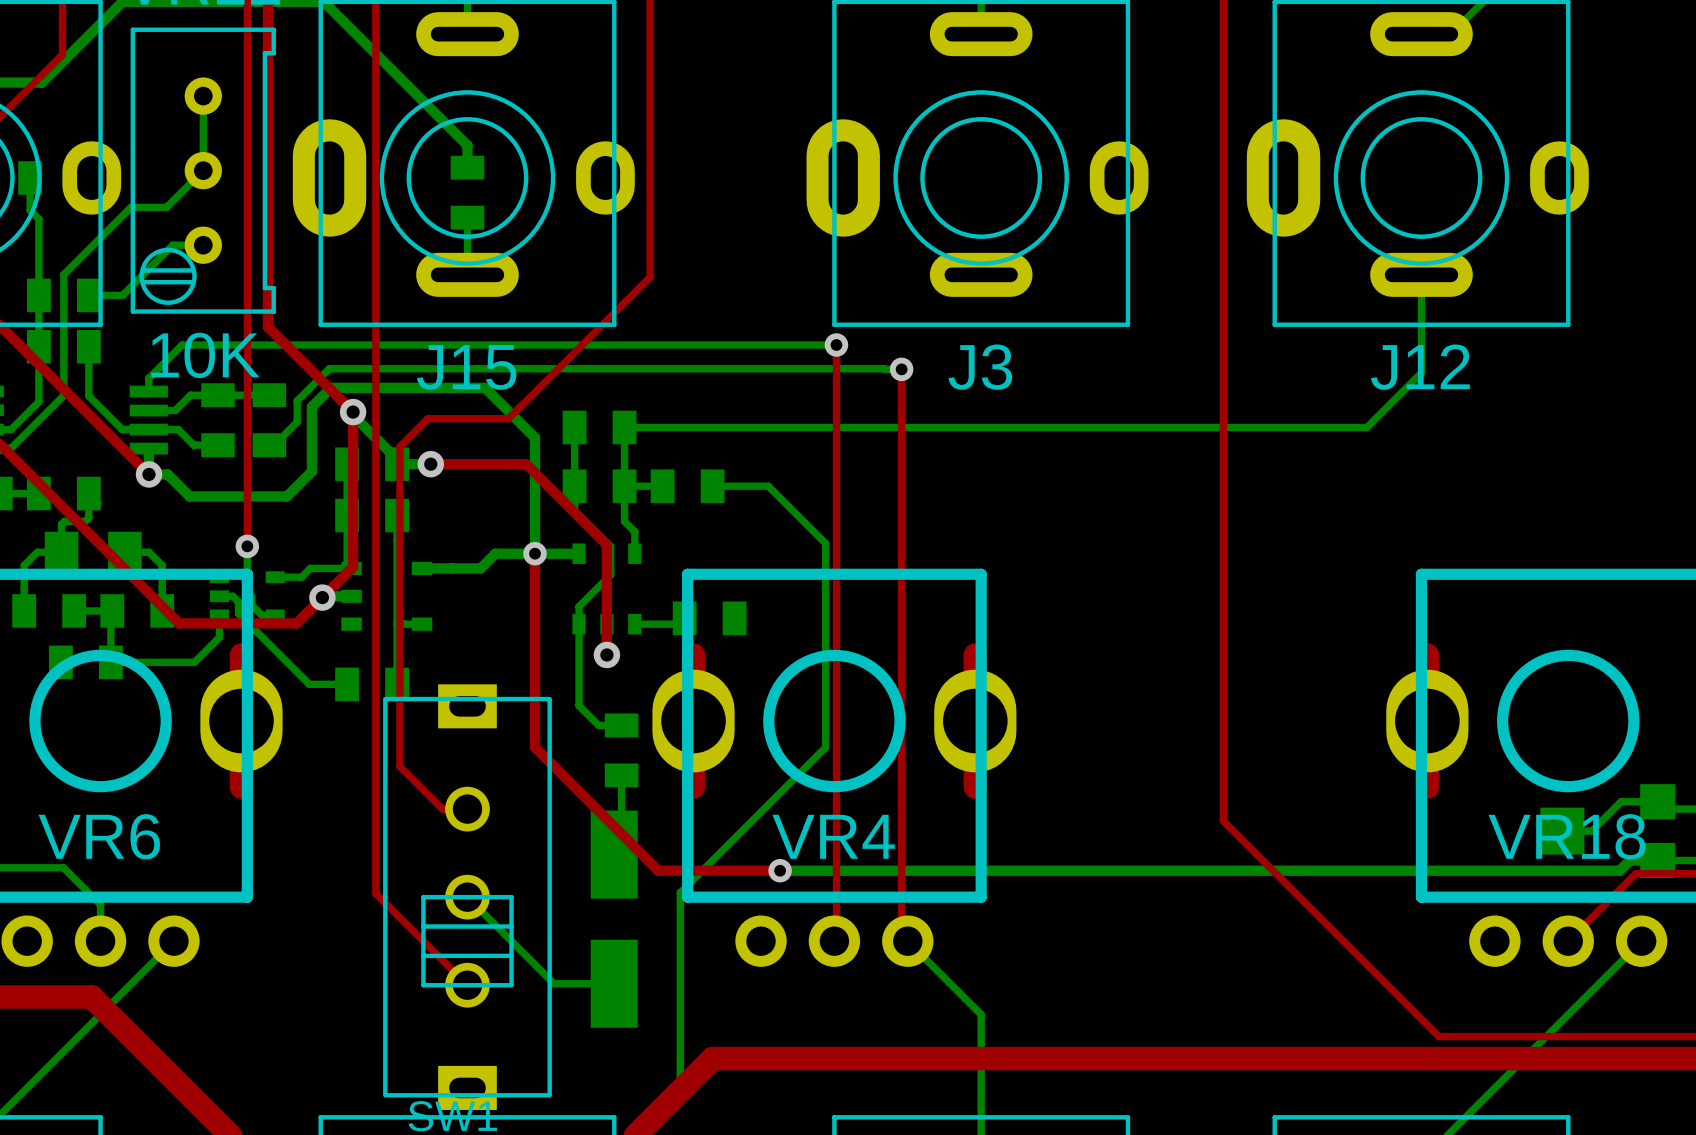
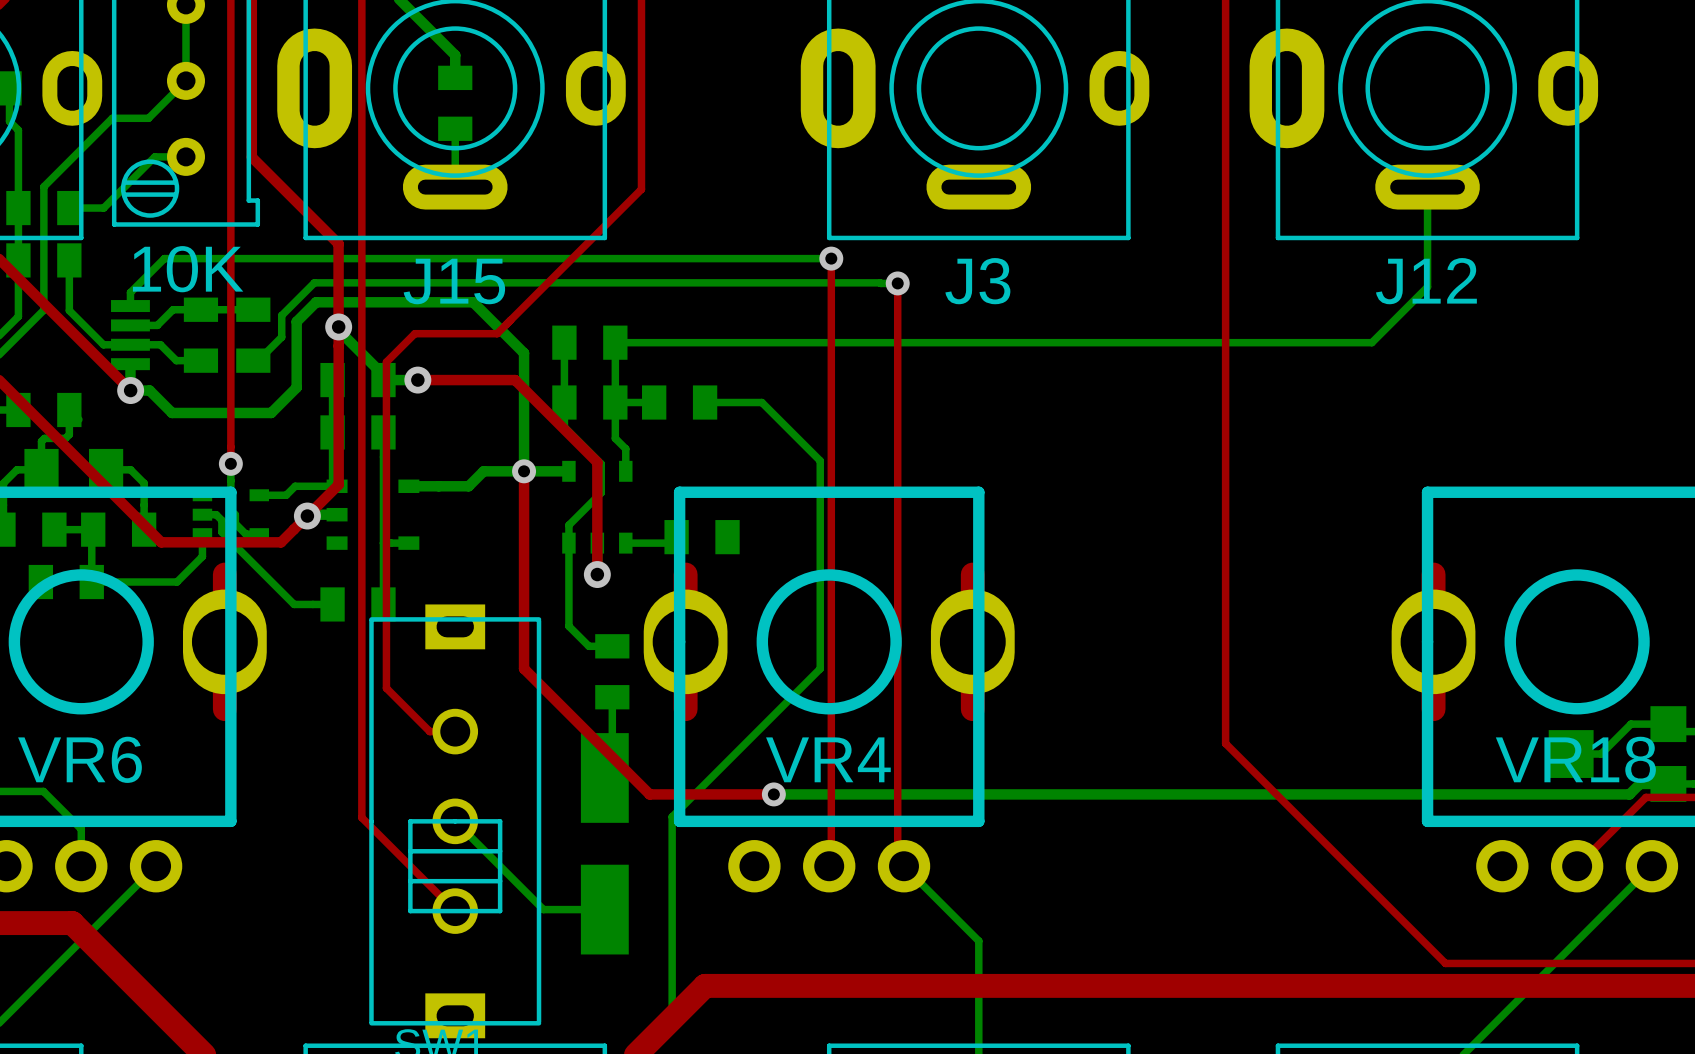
top track: (267, 245) (267, 326) (353, 411) -> (251, 157) (338, 243) (338, 326)

